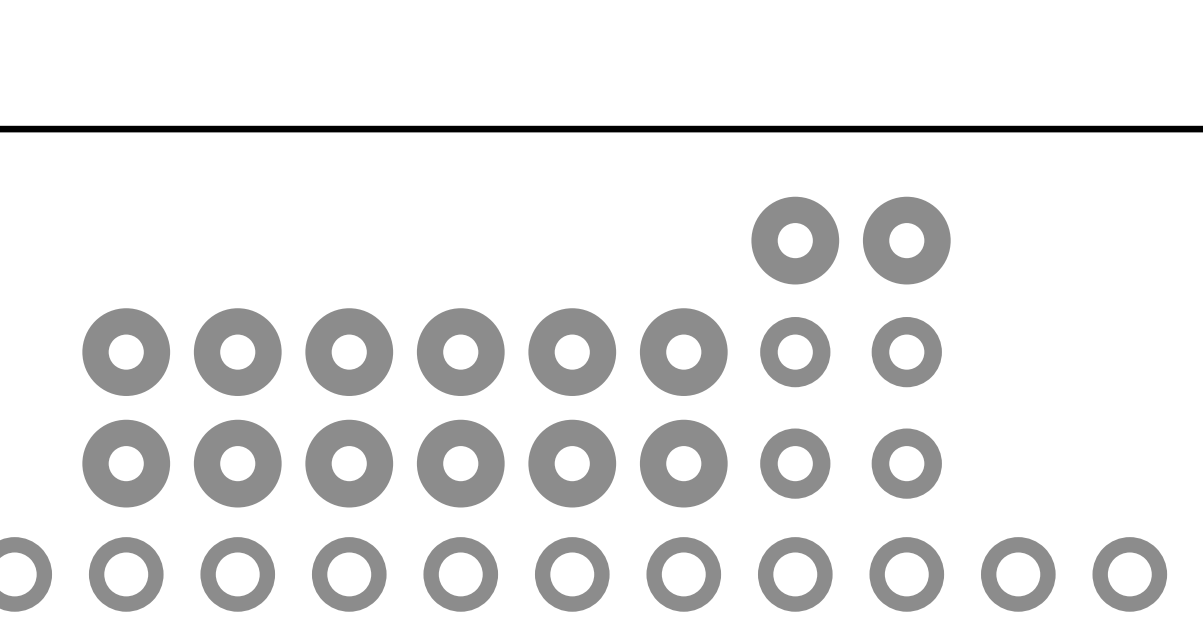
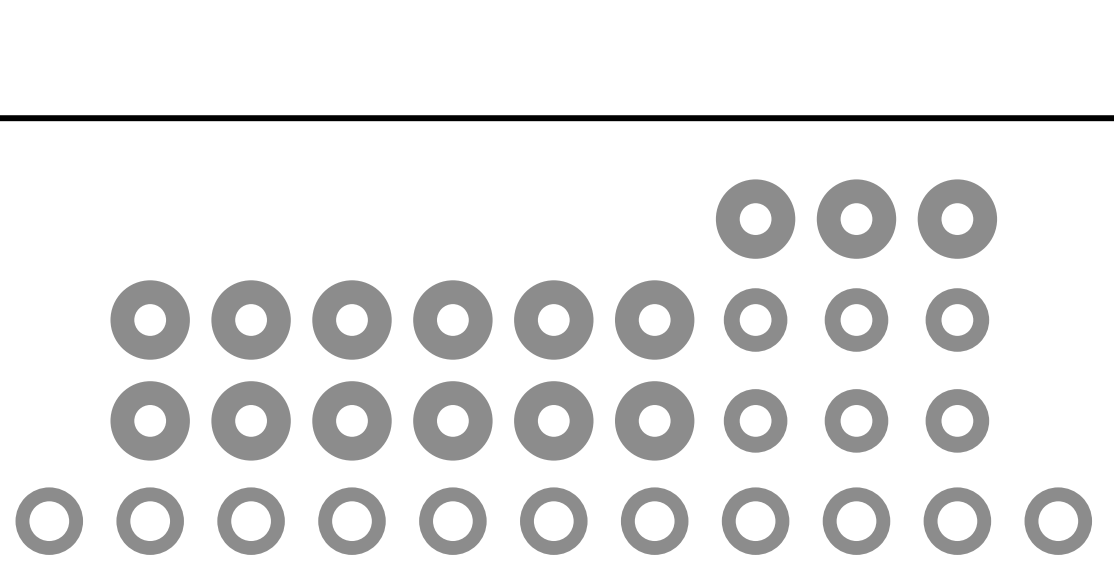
part: none -> (957, 219)
part: none -> (957, 370)

